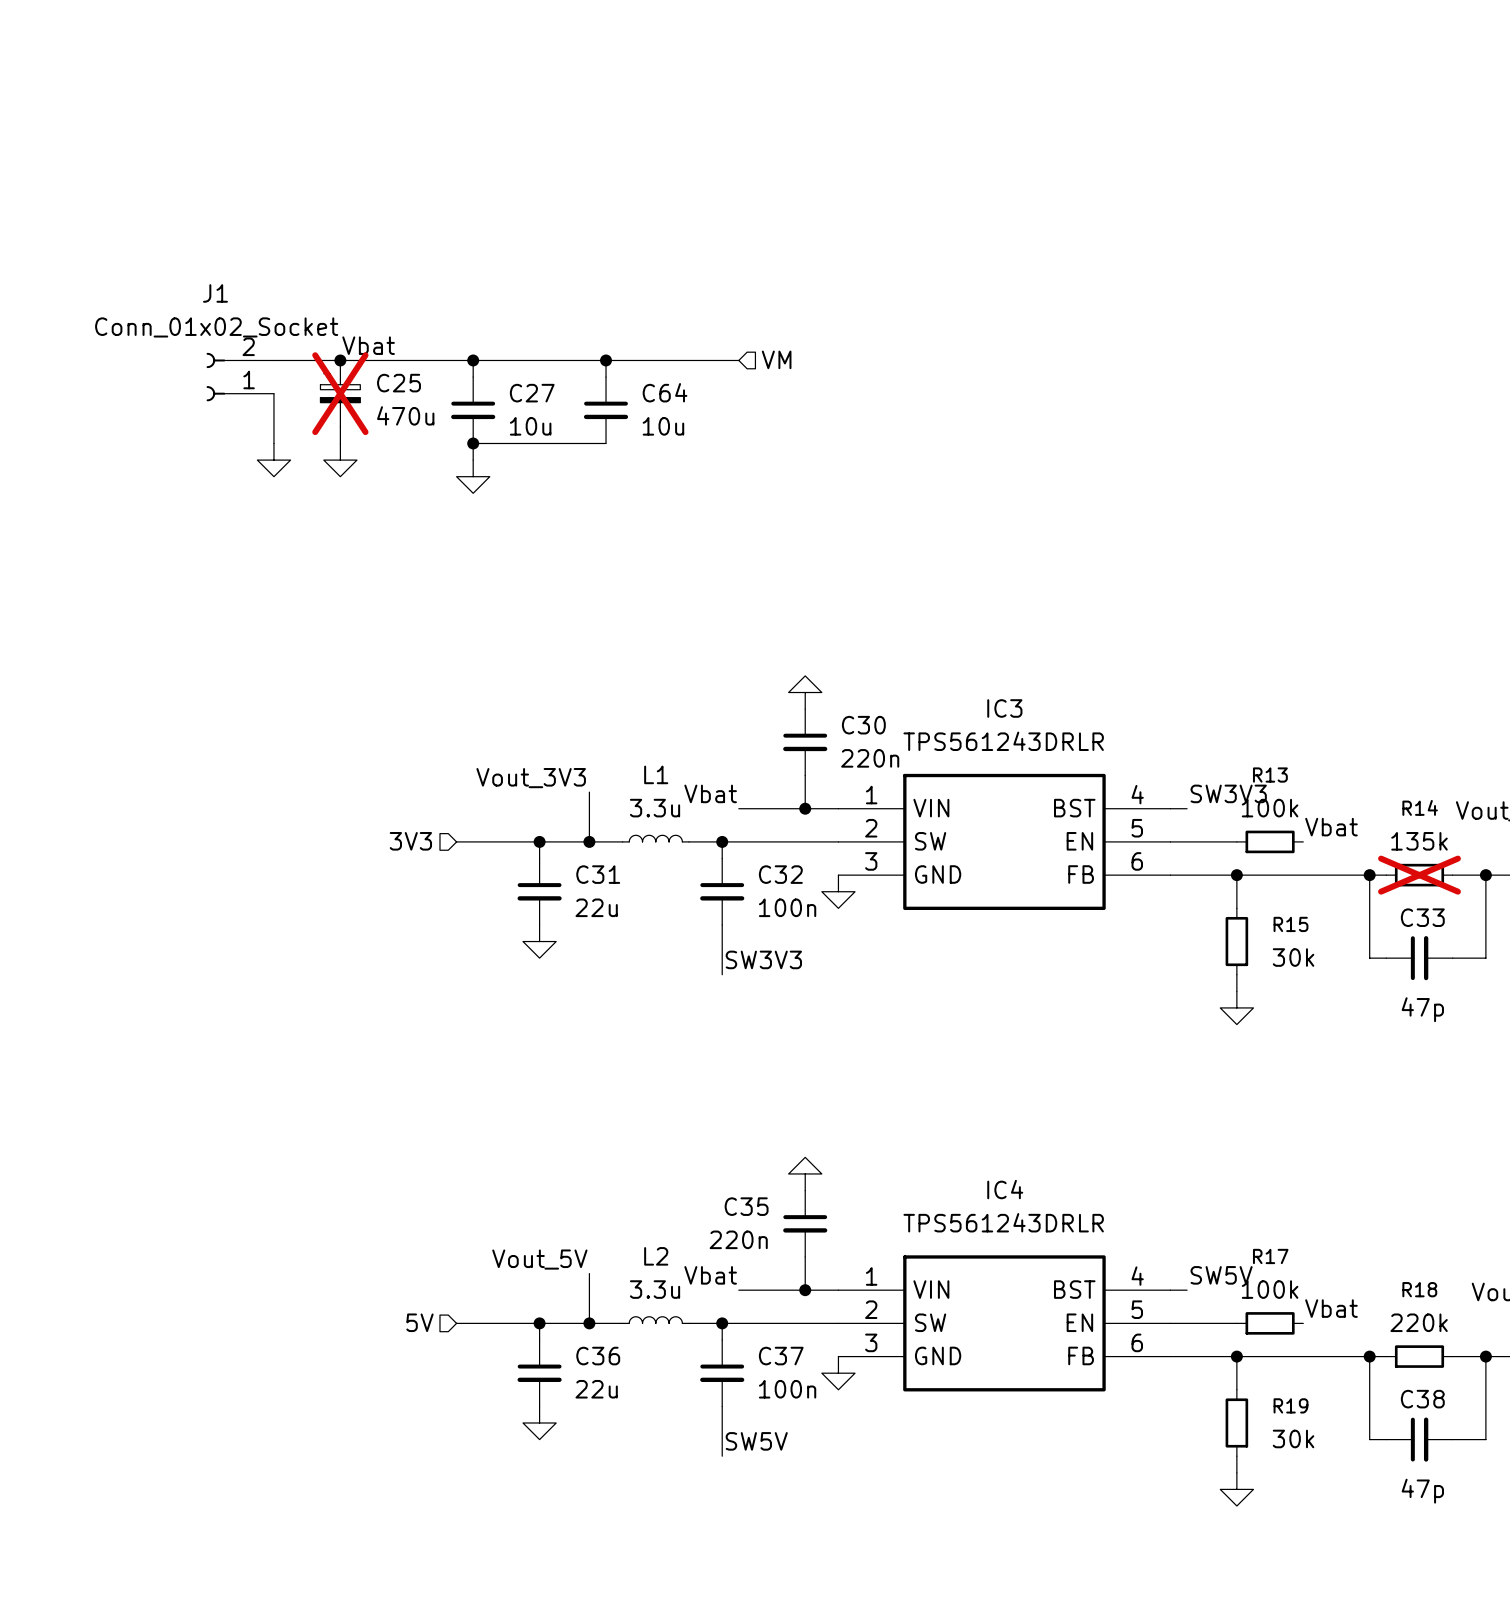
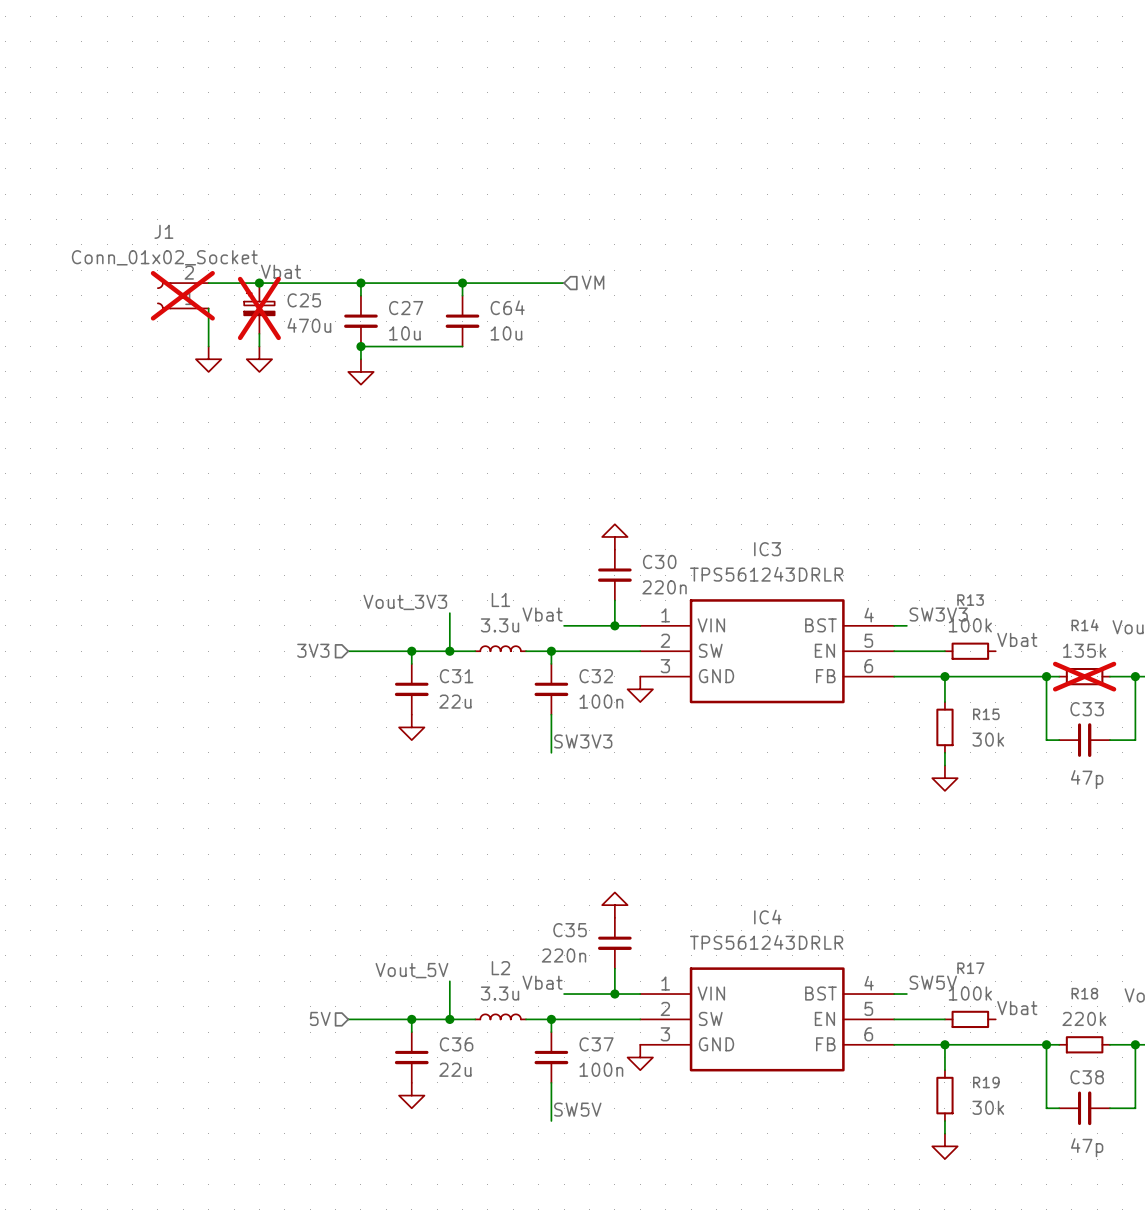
J1 do-not-place cross: none -> (182, 295)

